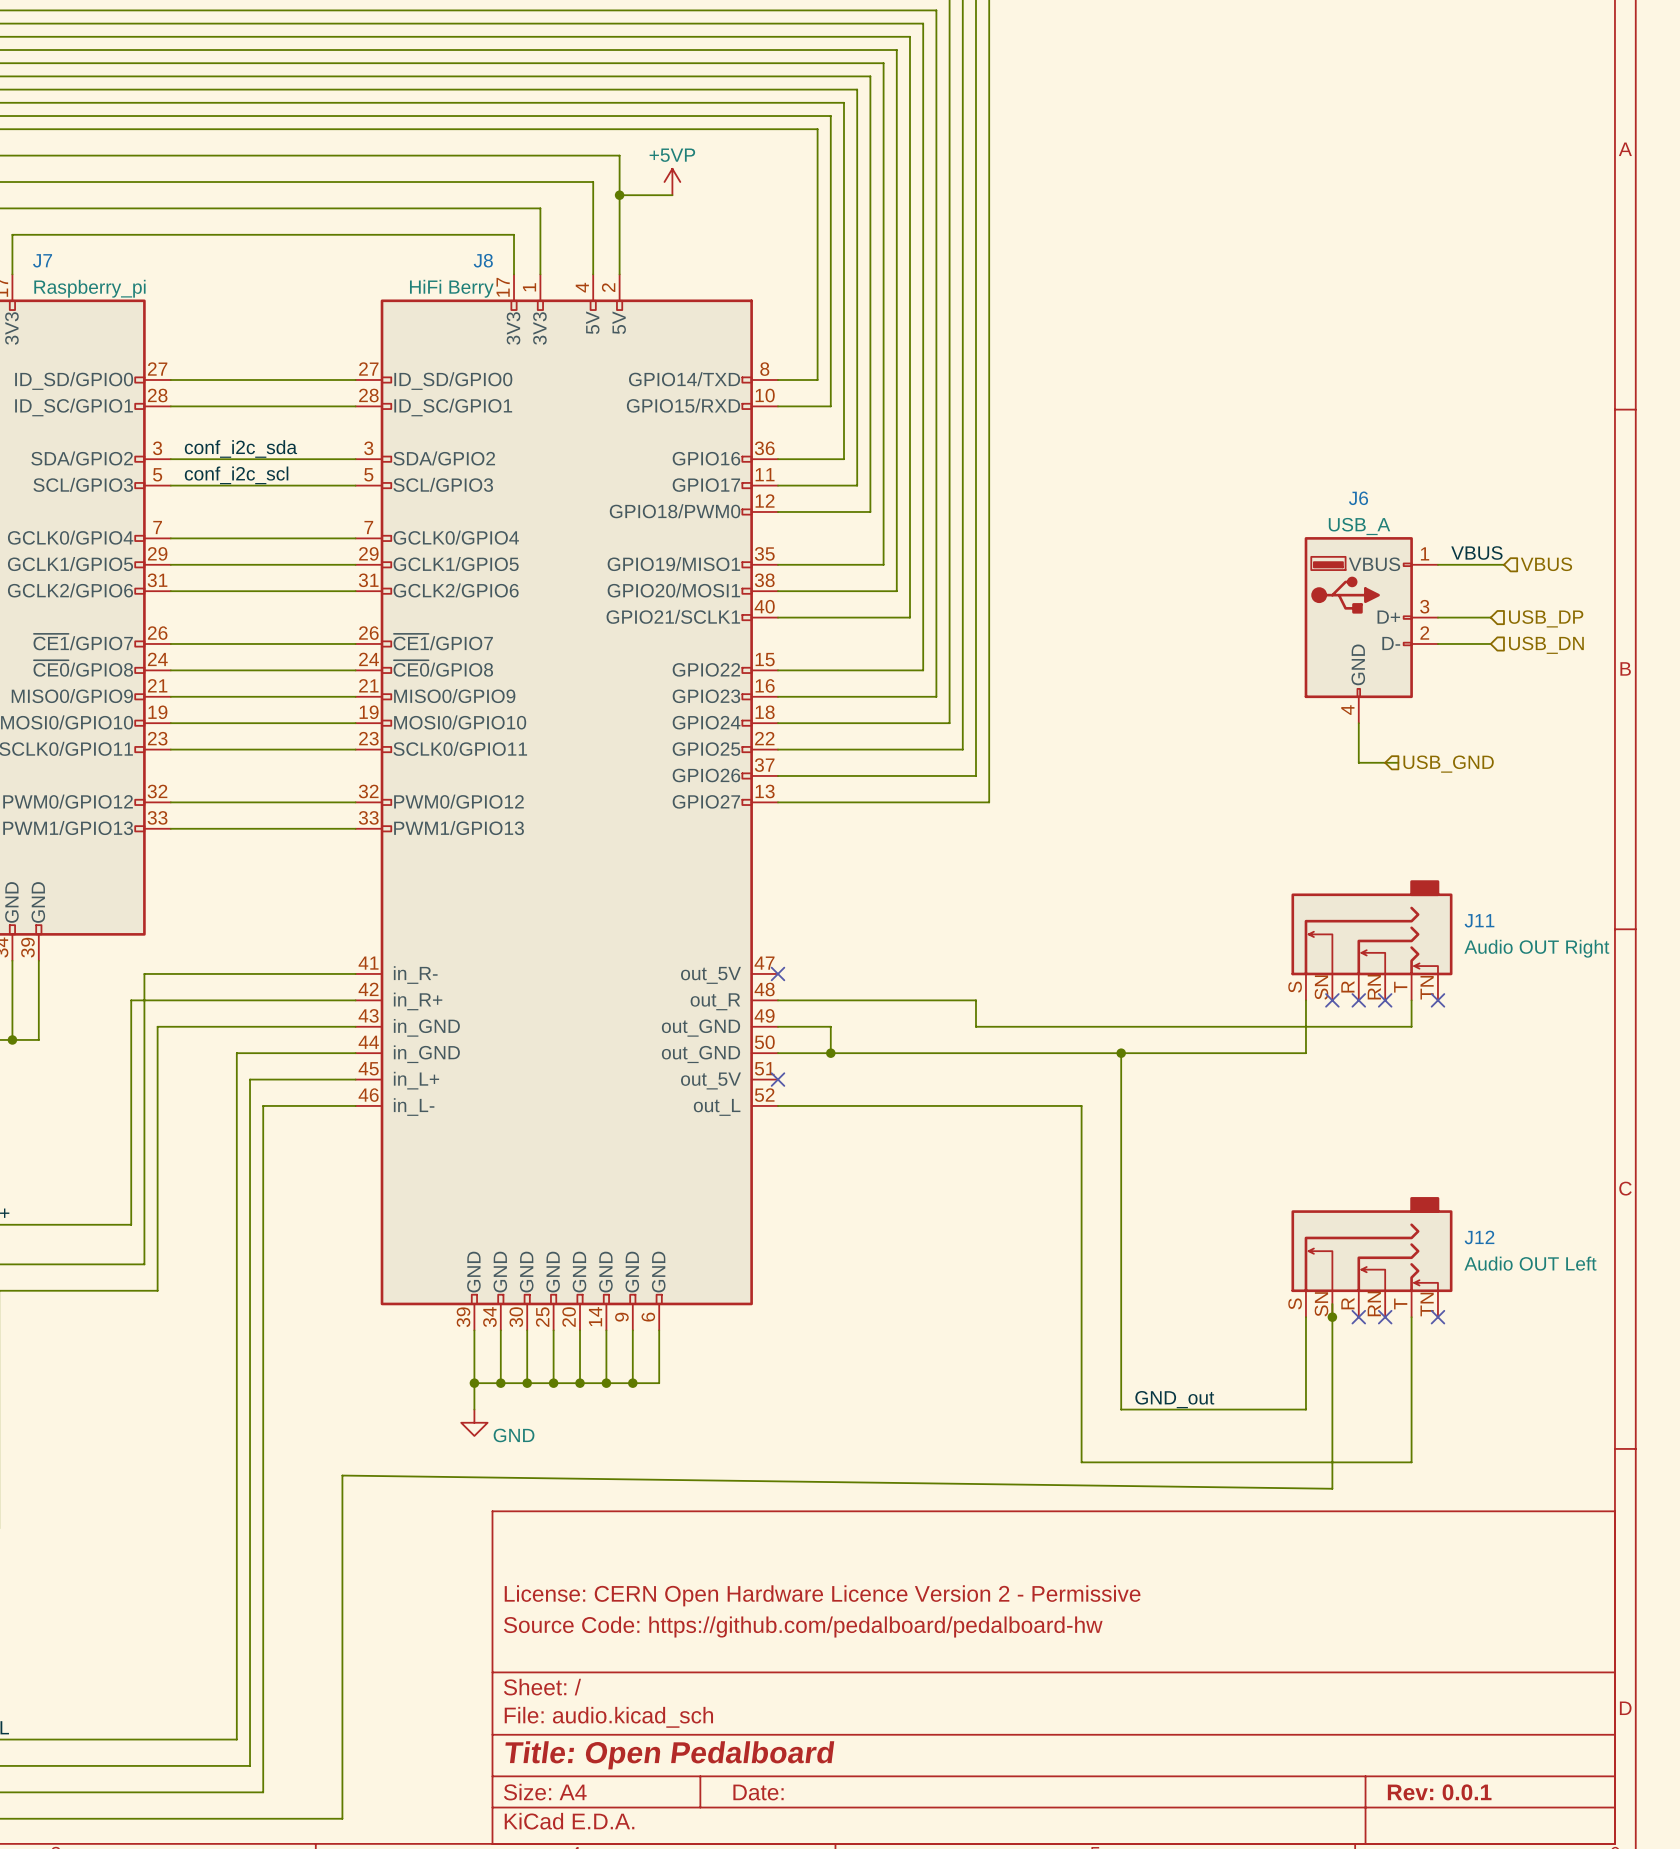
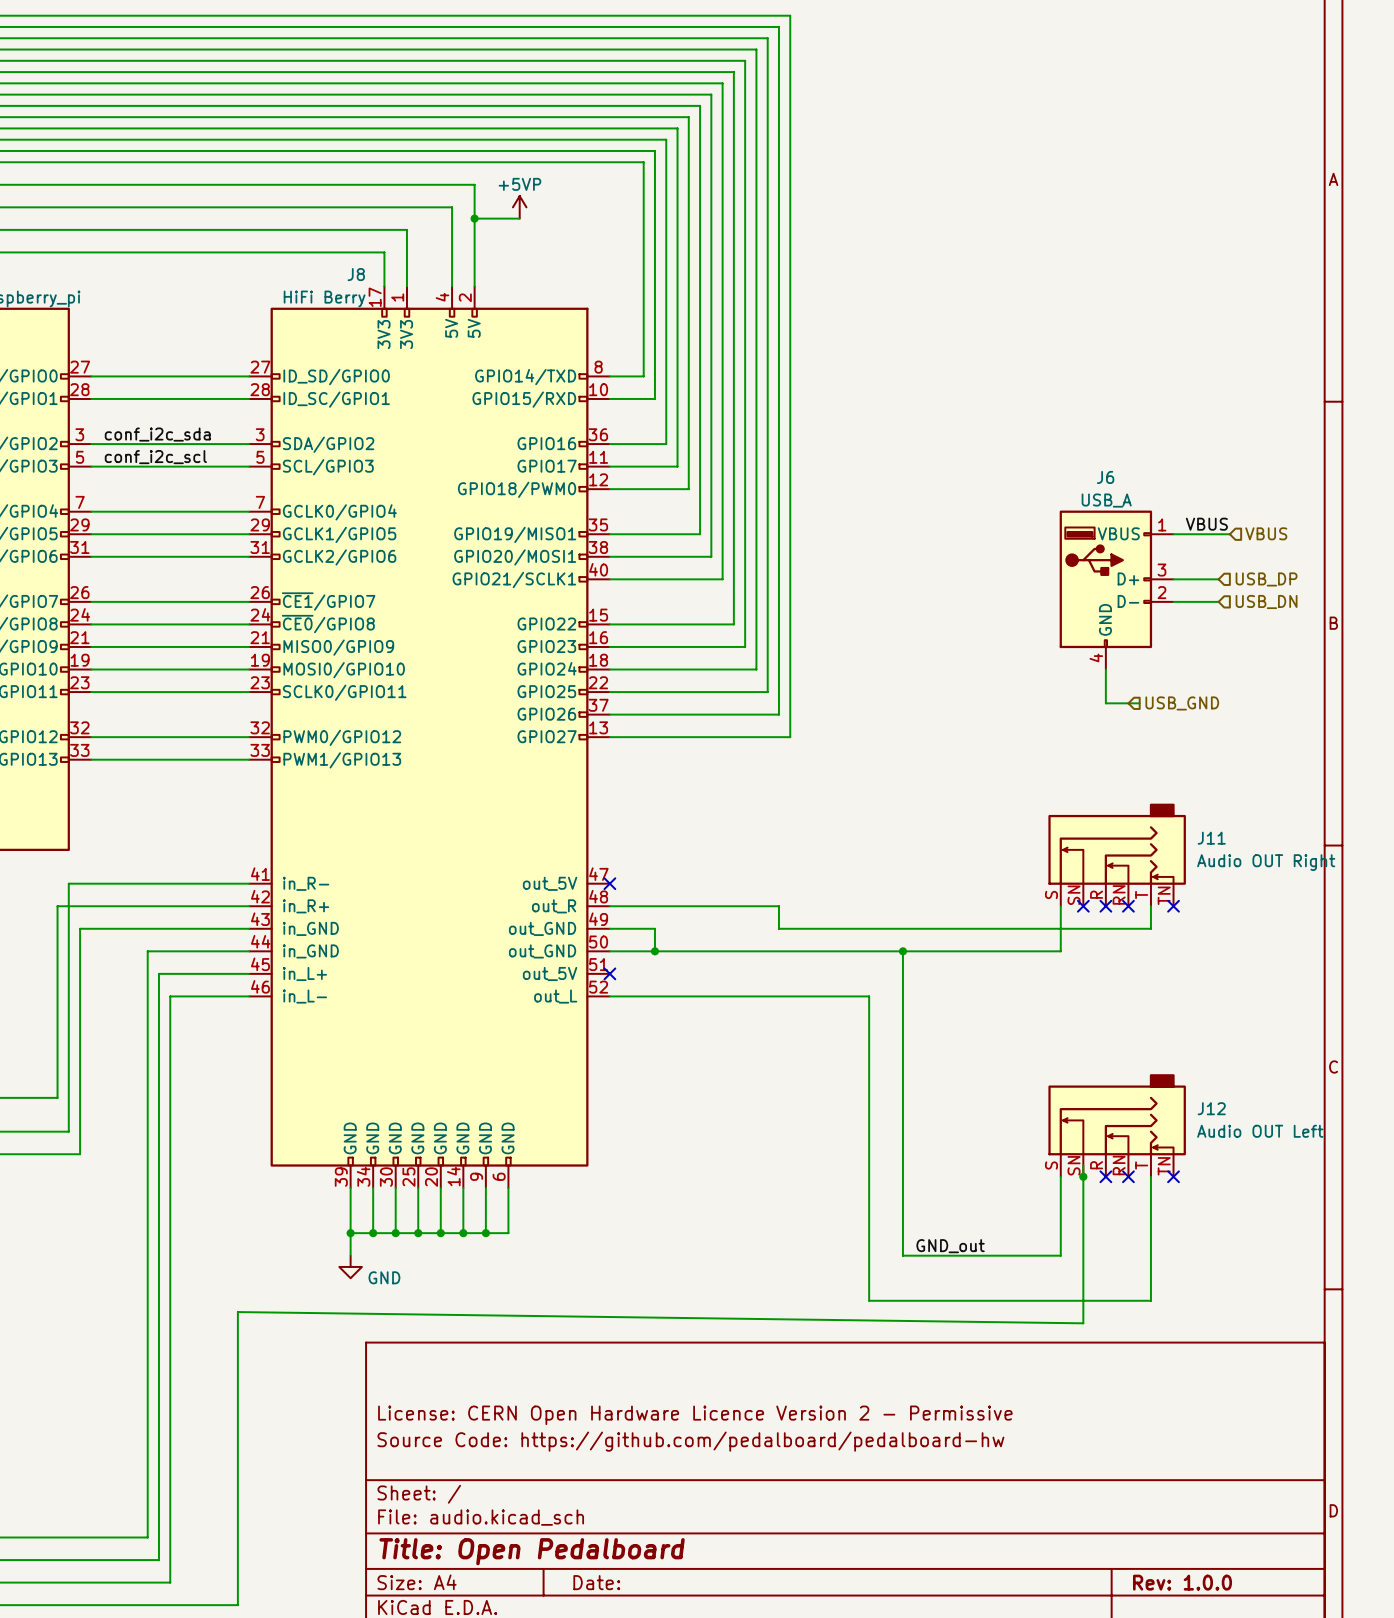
title block: Rev: 0.0.1 (1439, 1792) -> Rev: 1.0.0 (1182, 1582)

